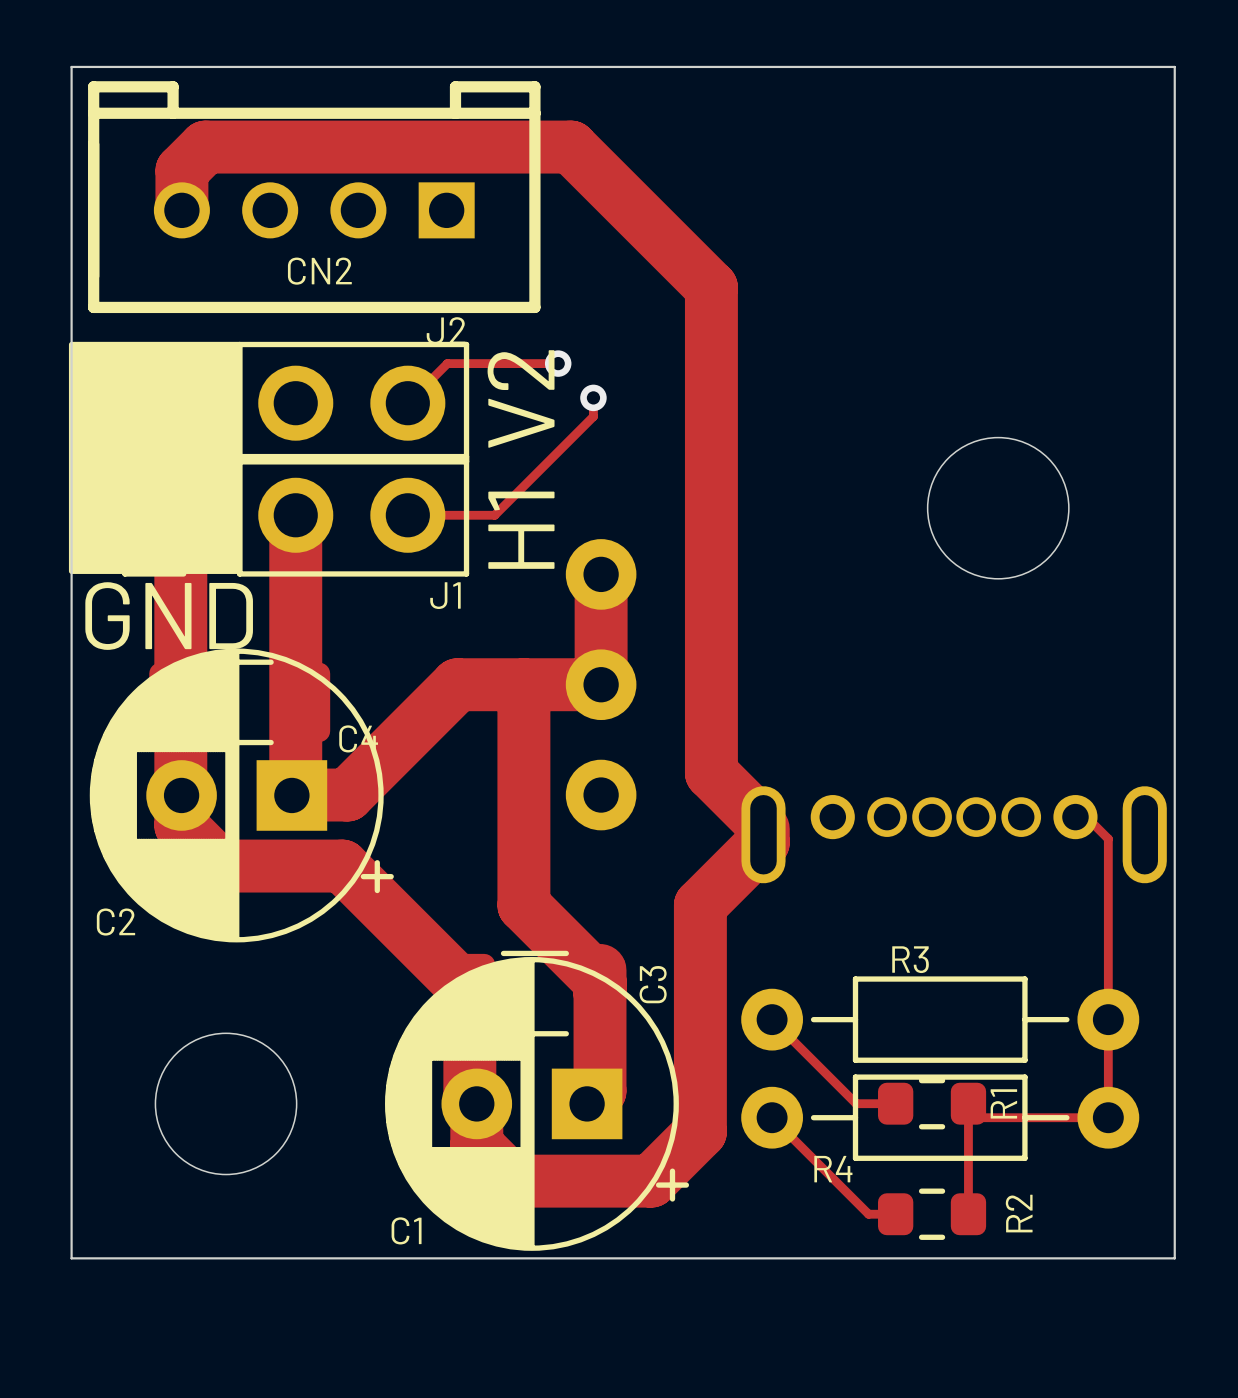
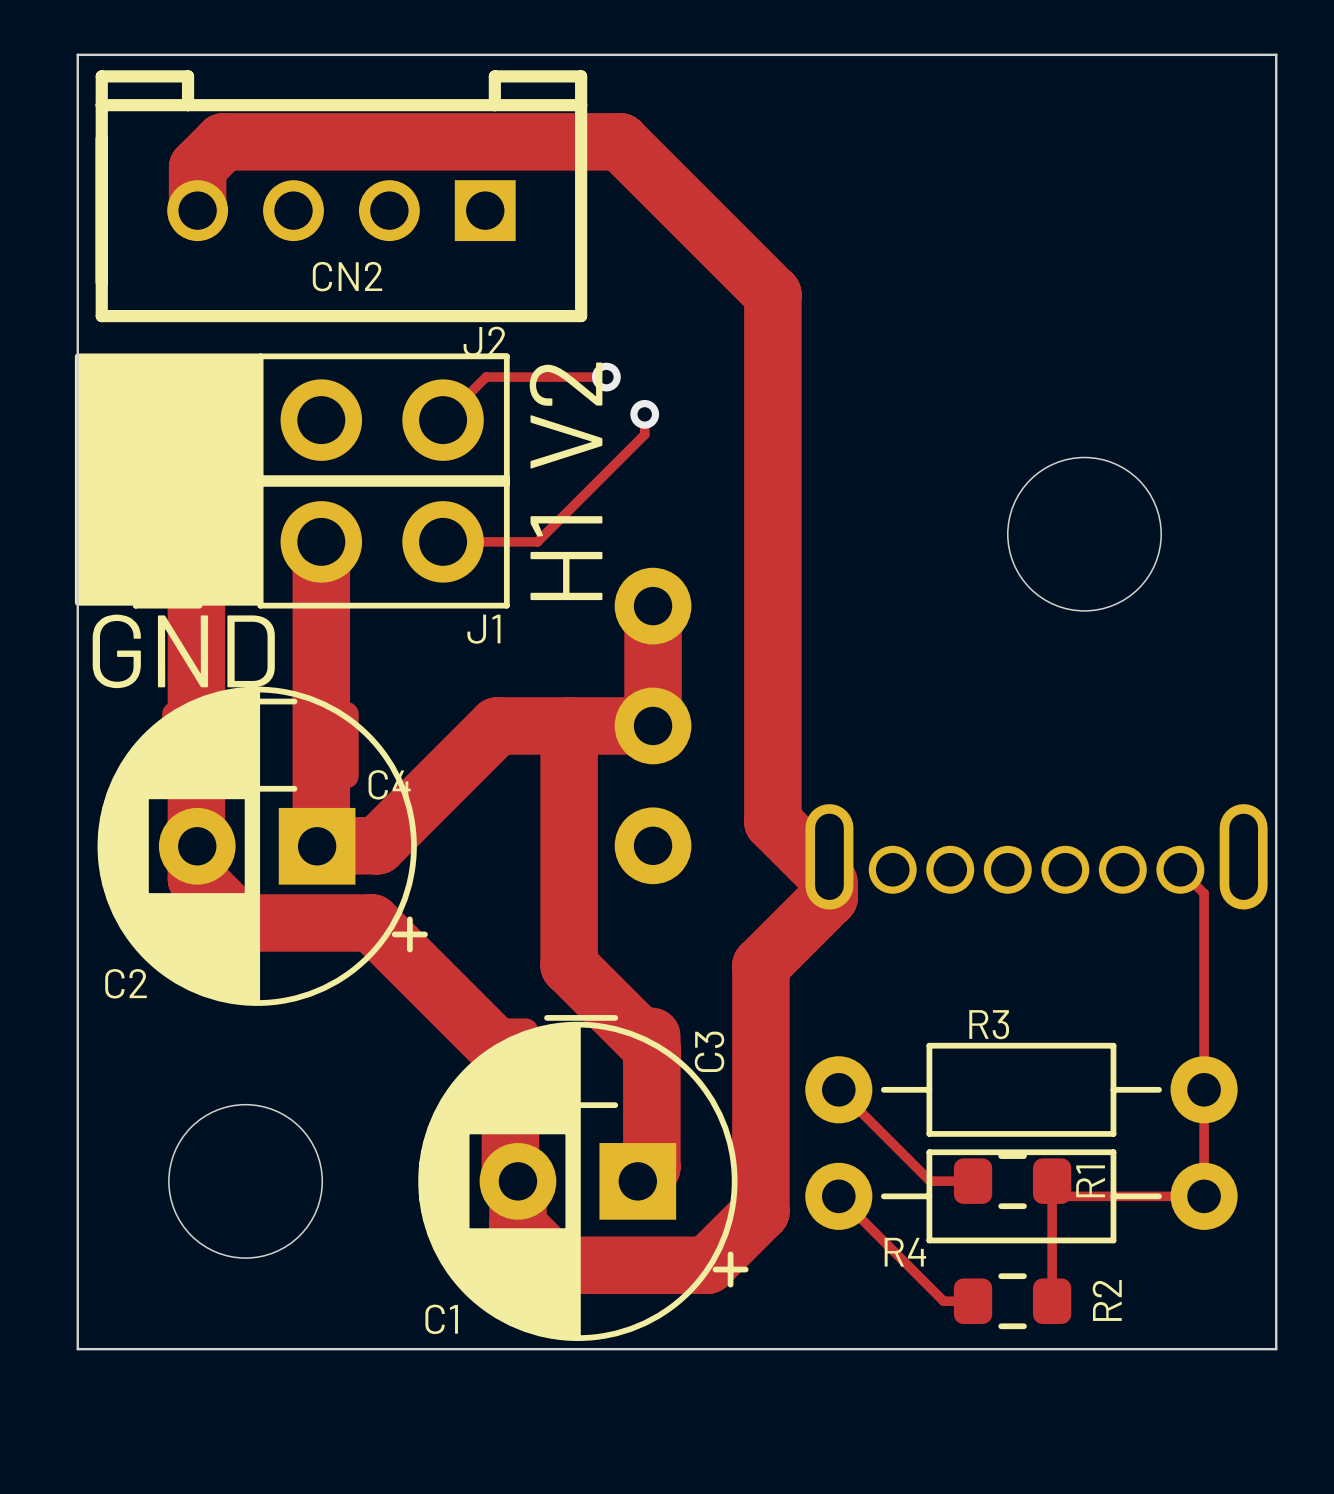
part footprint: [741, 786, 1167, 884] -> [805, 804, 1268, 910]

